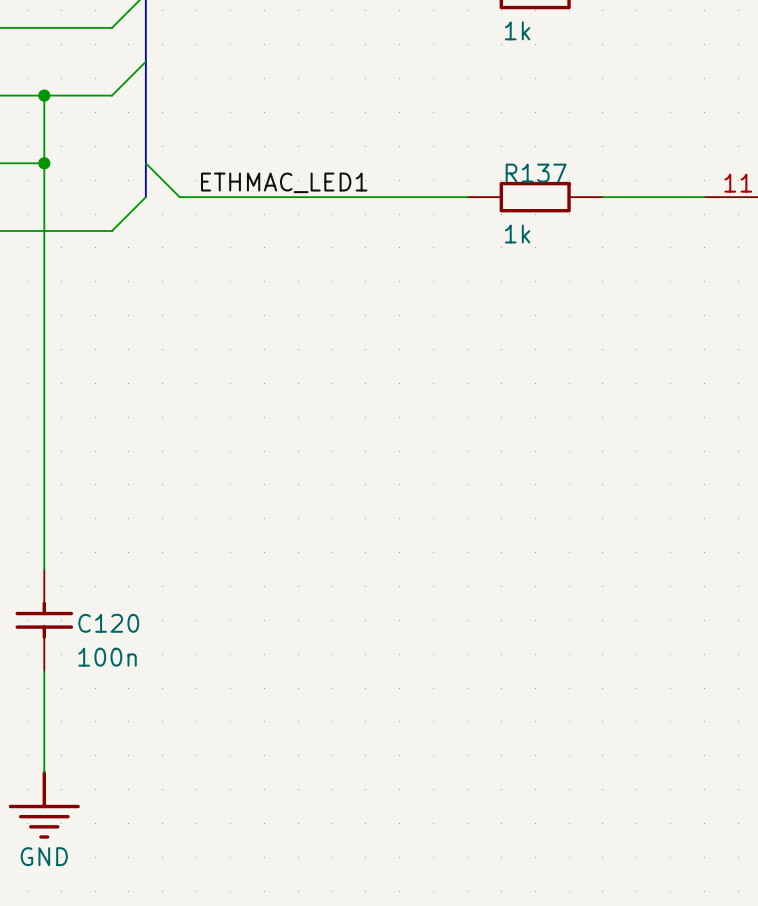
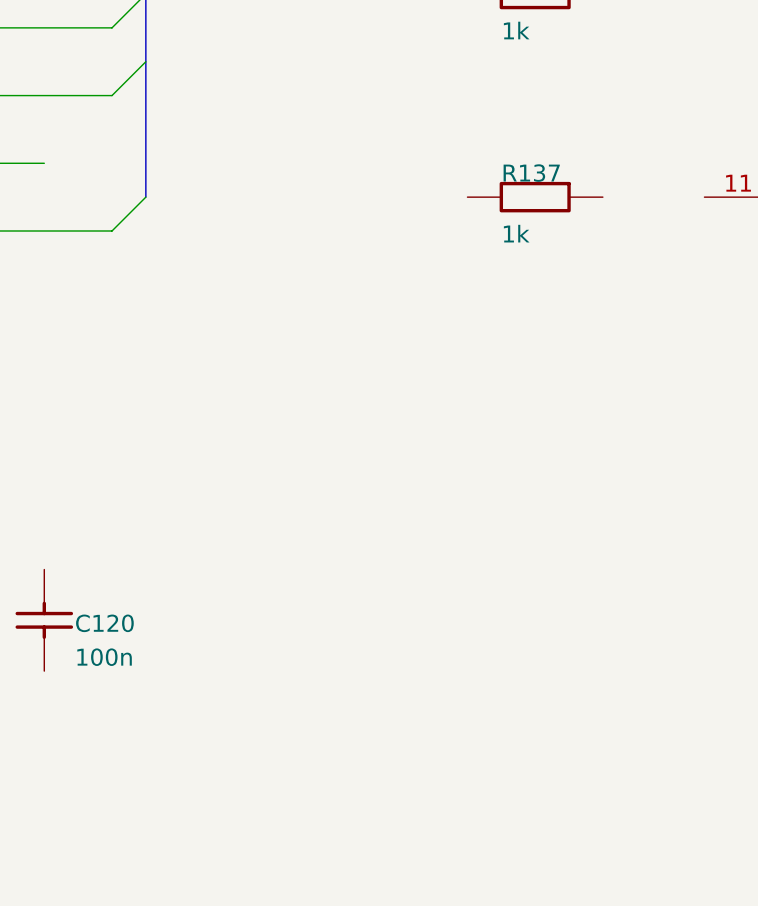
wire: (44, 95) (44, 569) -> none
junction: (44, 95) -> none
junction: (44, 163) -> none
wire: (145, 163) (179, 197) (467, 197) -> none
label: ETHMAC_LED1 (284, 182) -> none
wire: (602, 197) (704, 197) -> none
wire: (44, 671) (44, 772) -> none
power symbol: GND (44, 804) -> none

